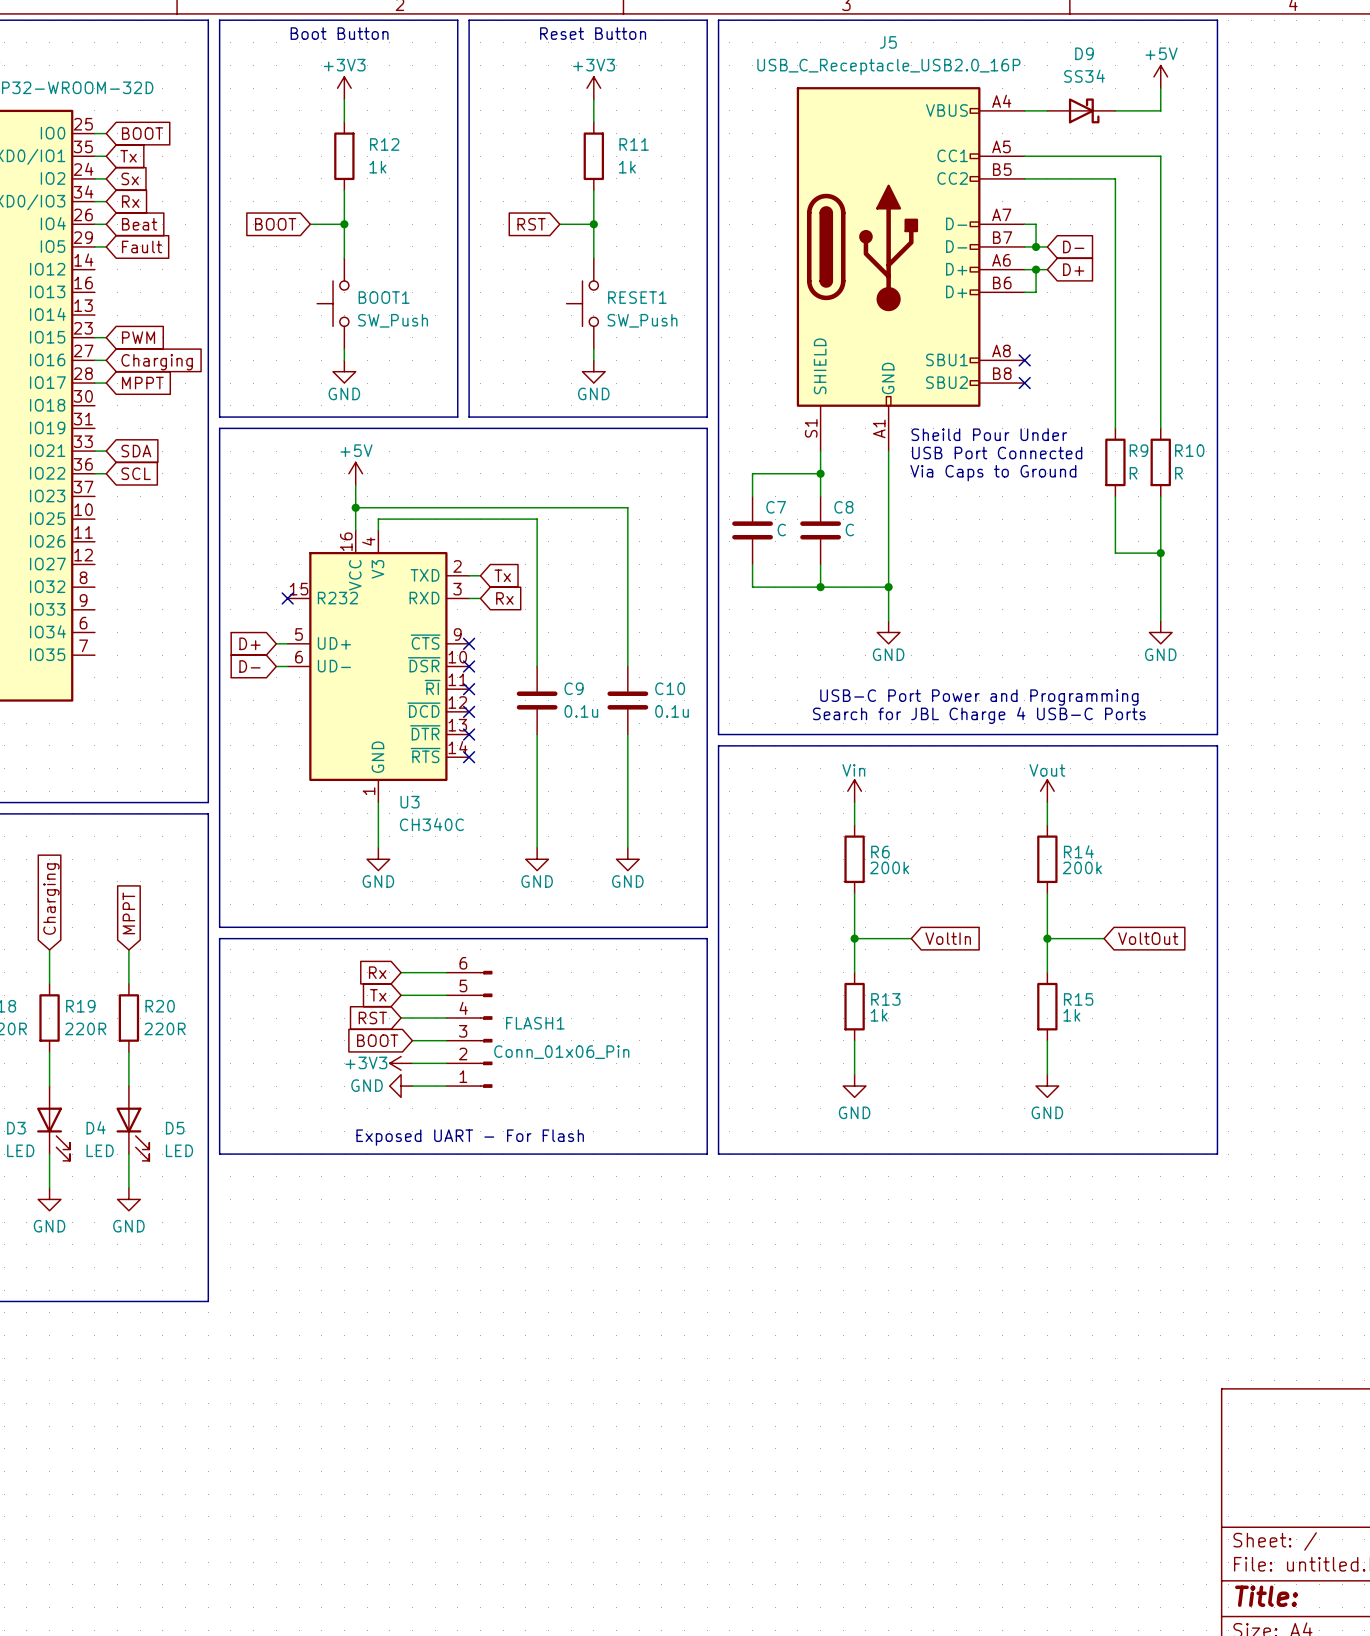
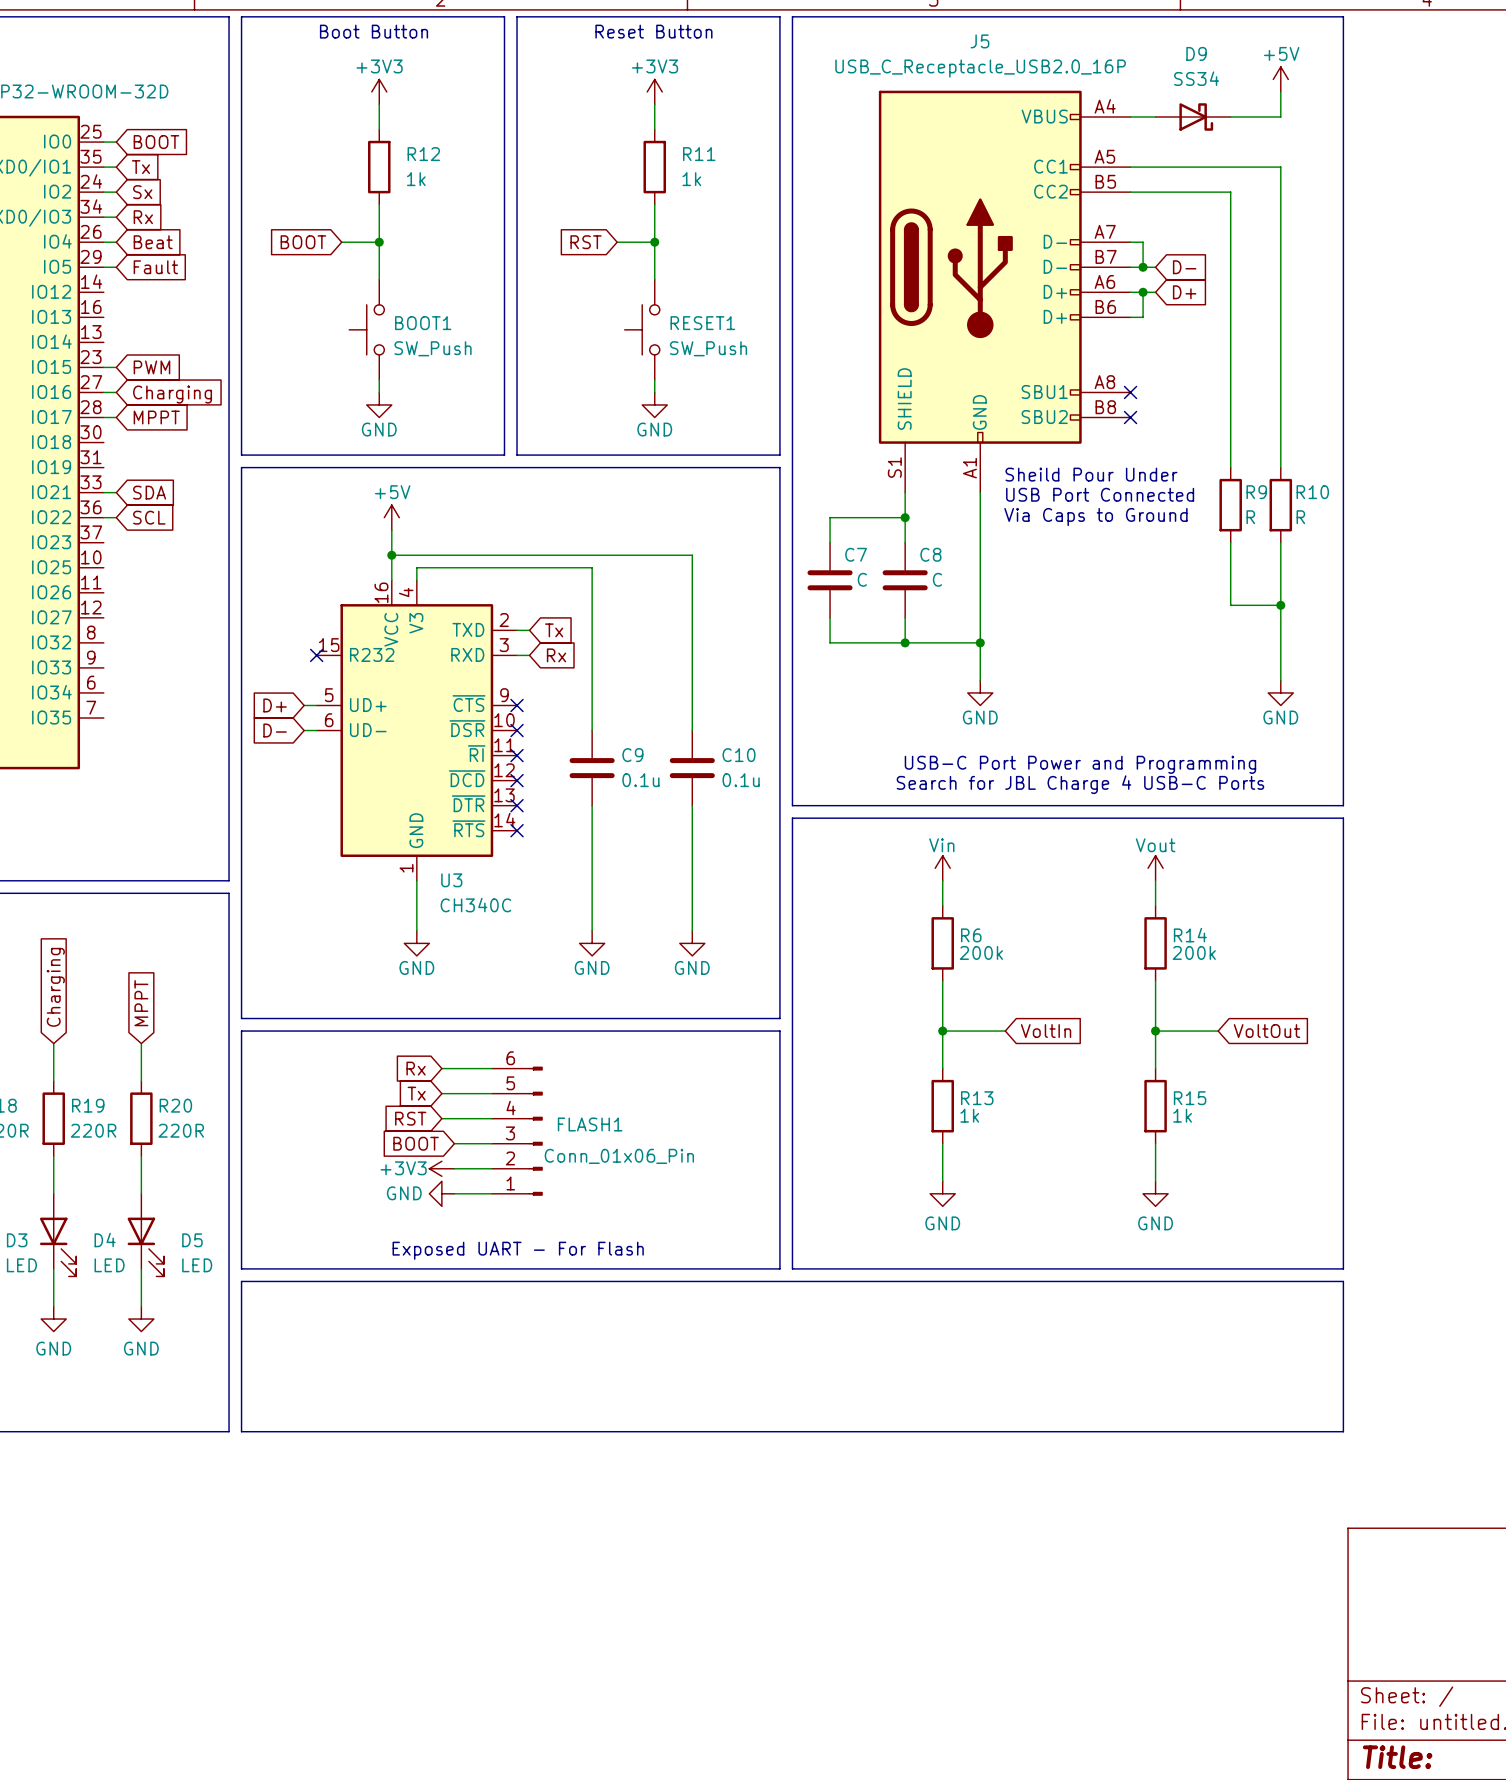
line: none -> (241, 1281) (1343, 1281) (1343, 1431) (241, 1431) (241, 1281)

